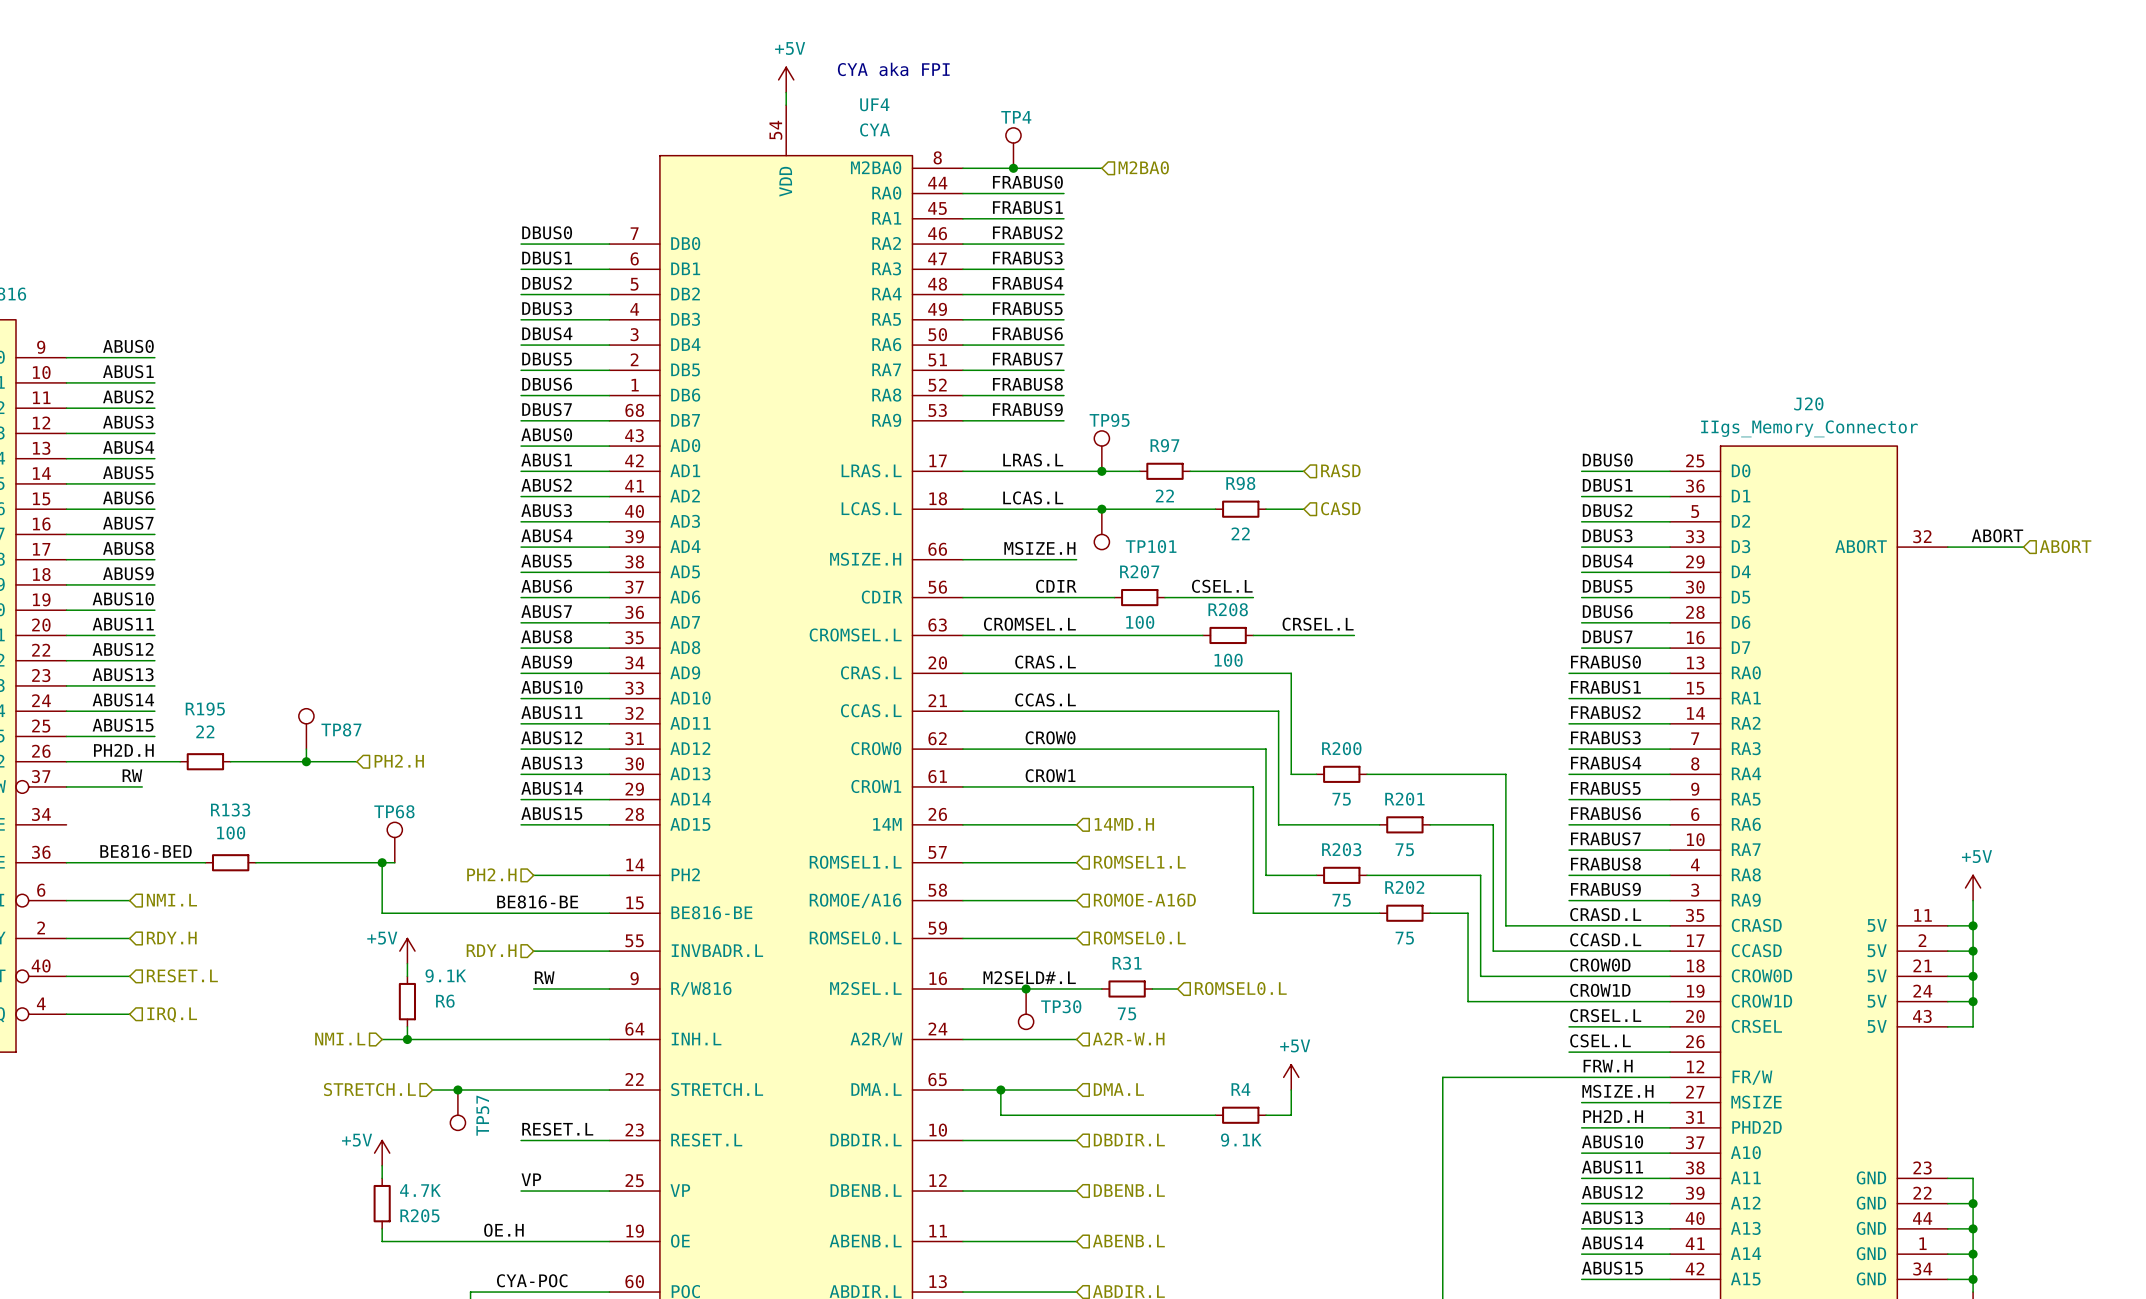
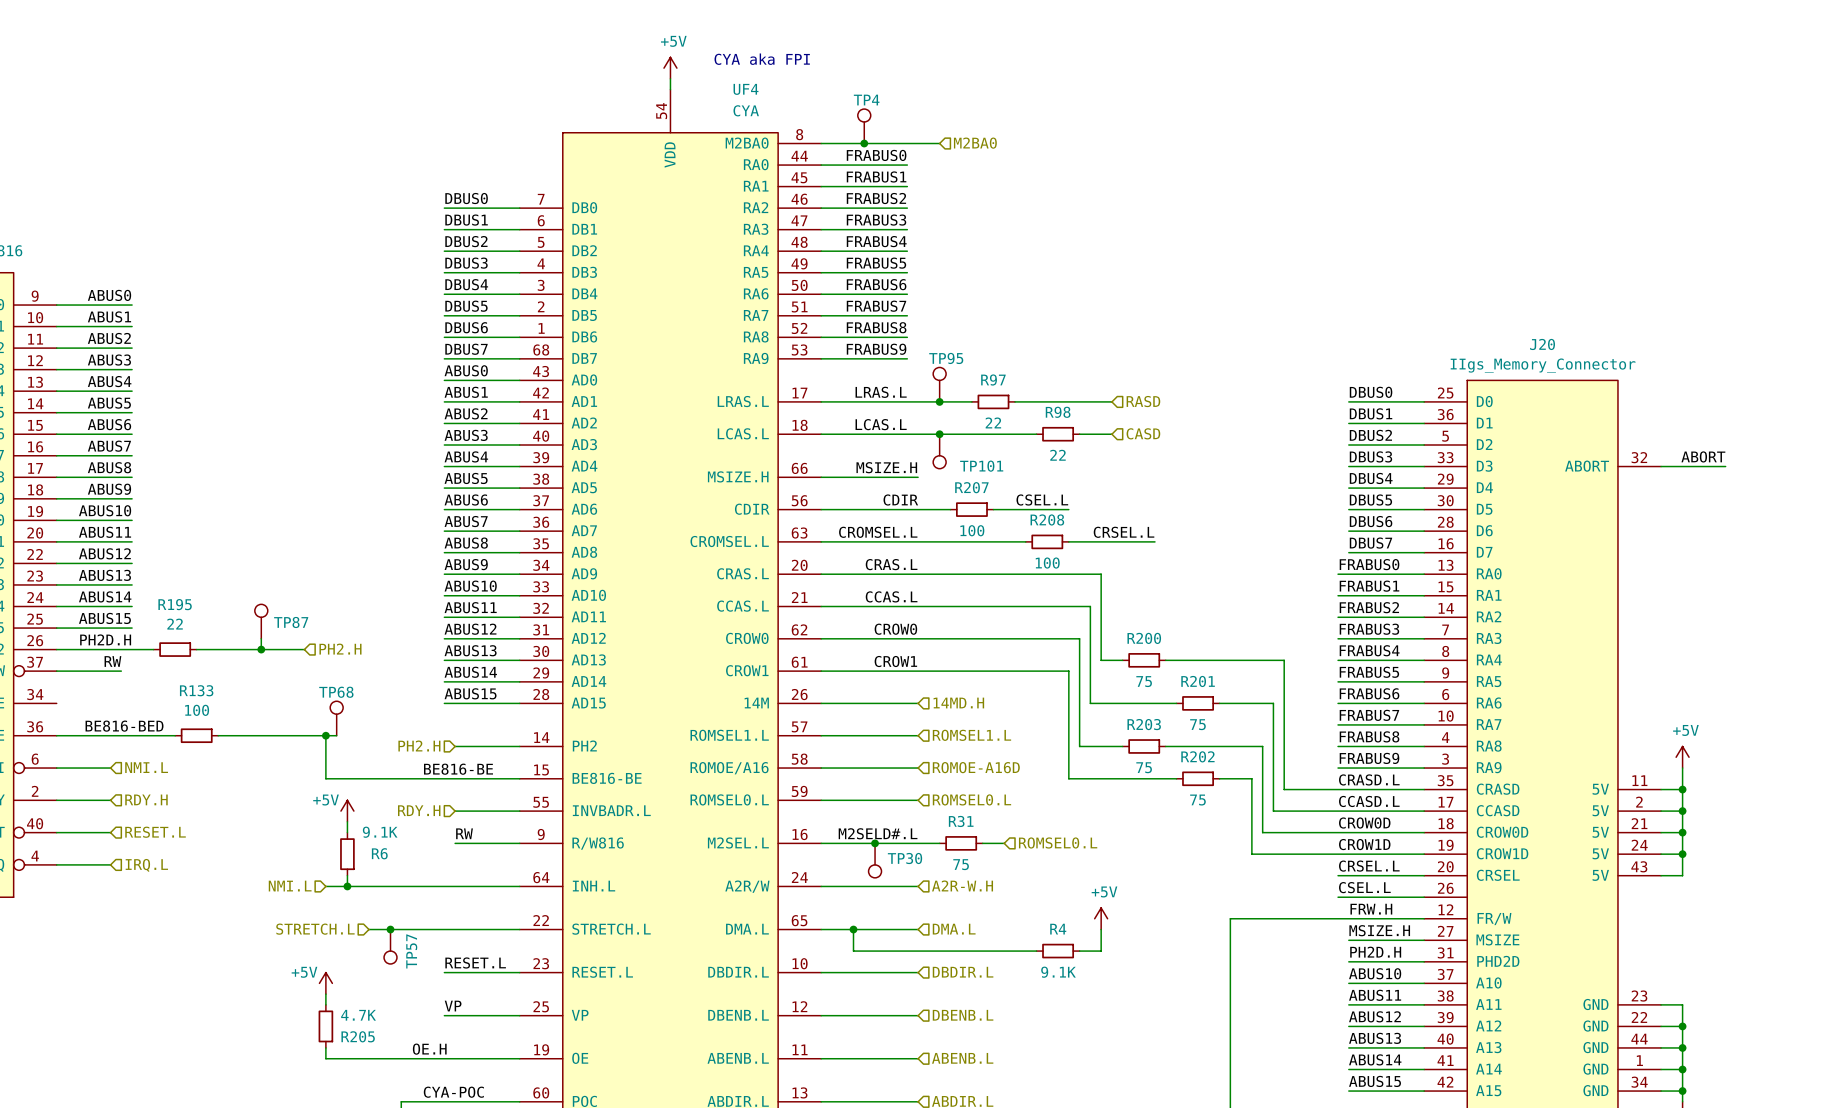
hierarchical label: ABORT (2065, 546) -> none

